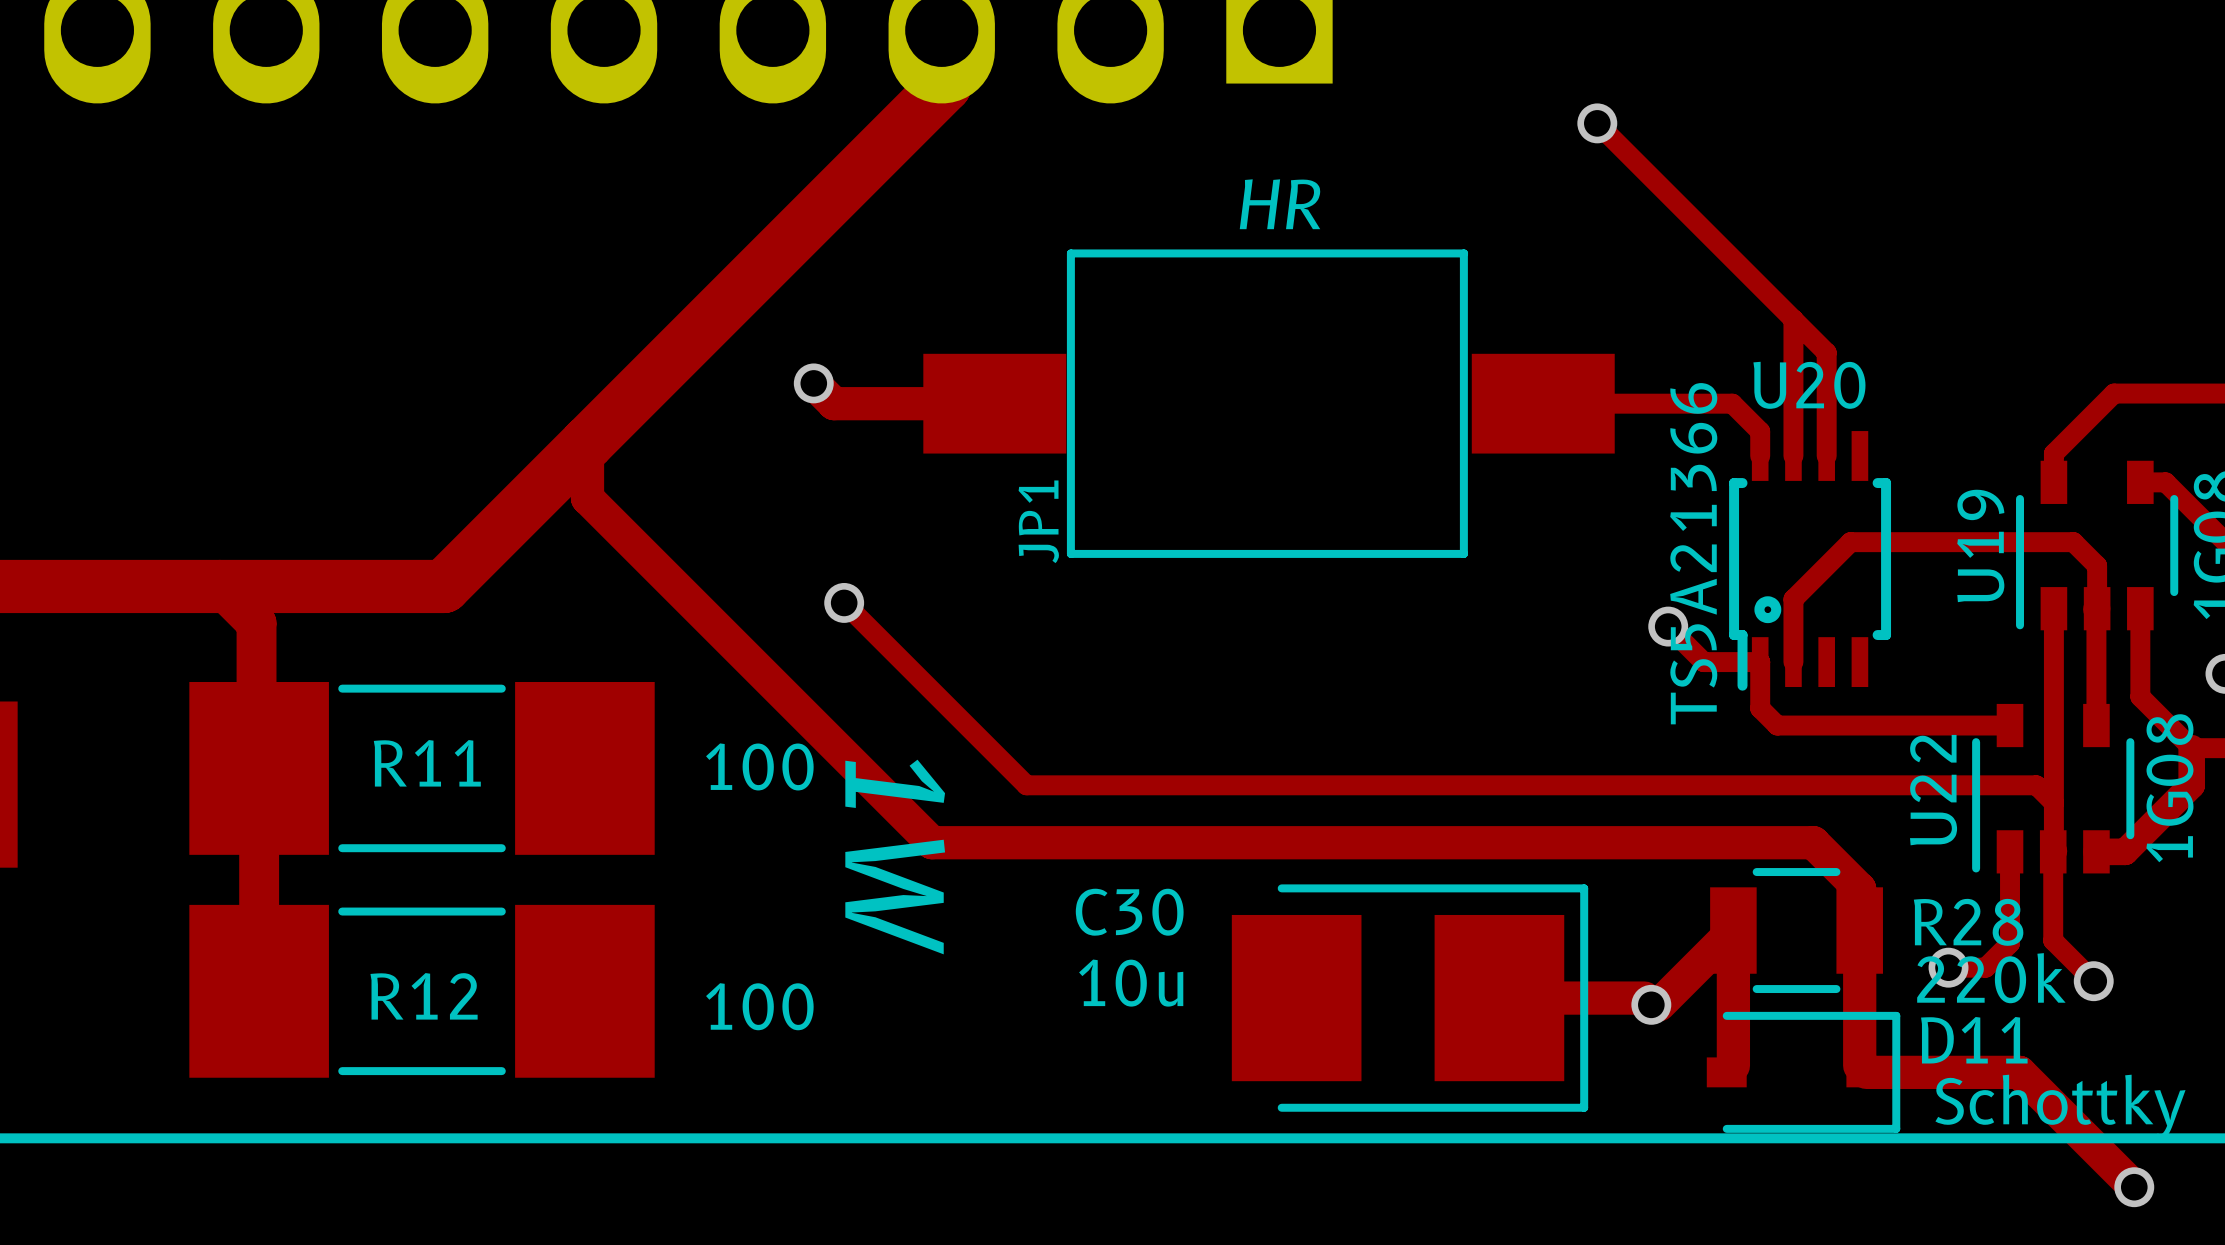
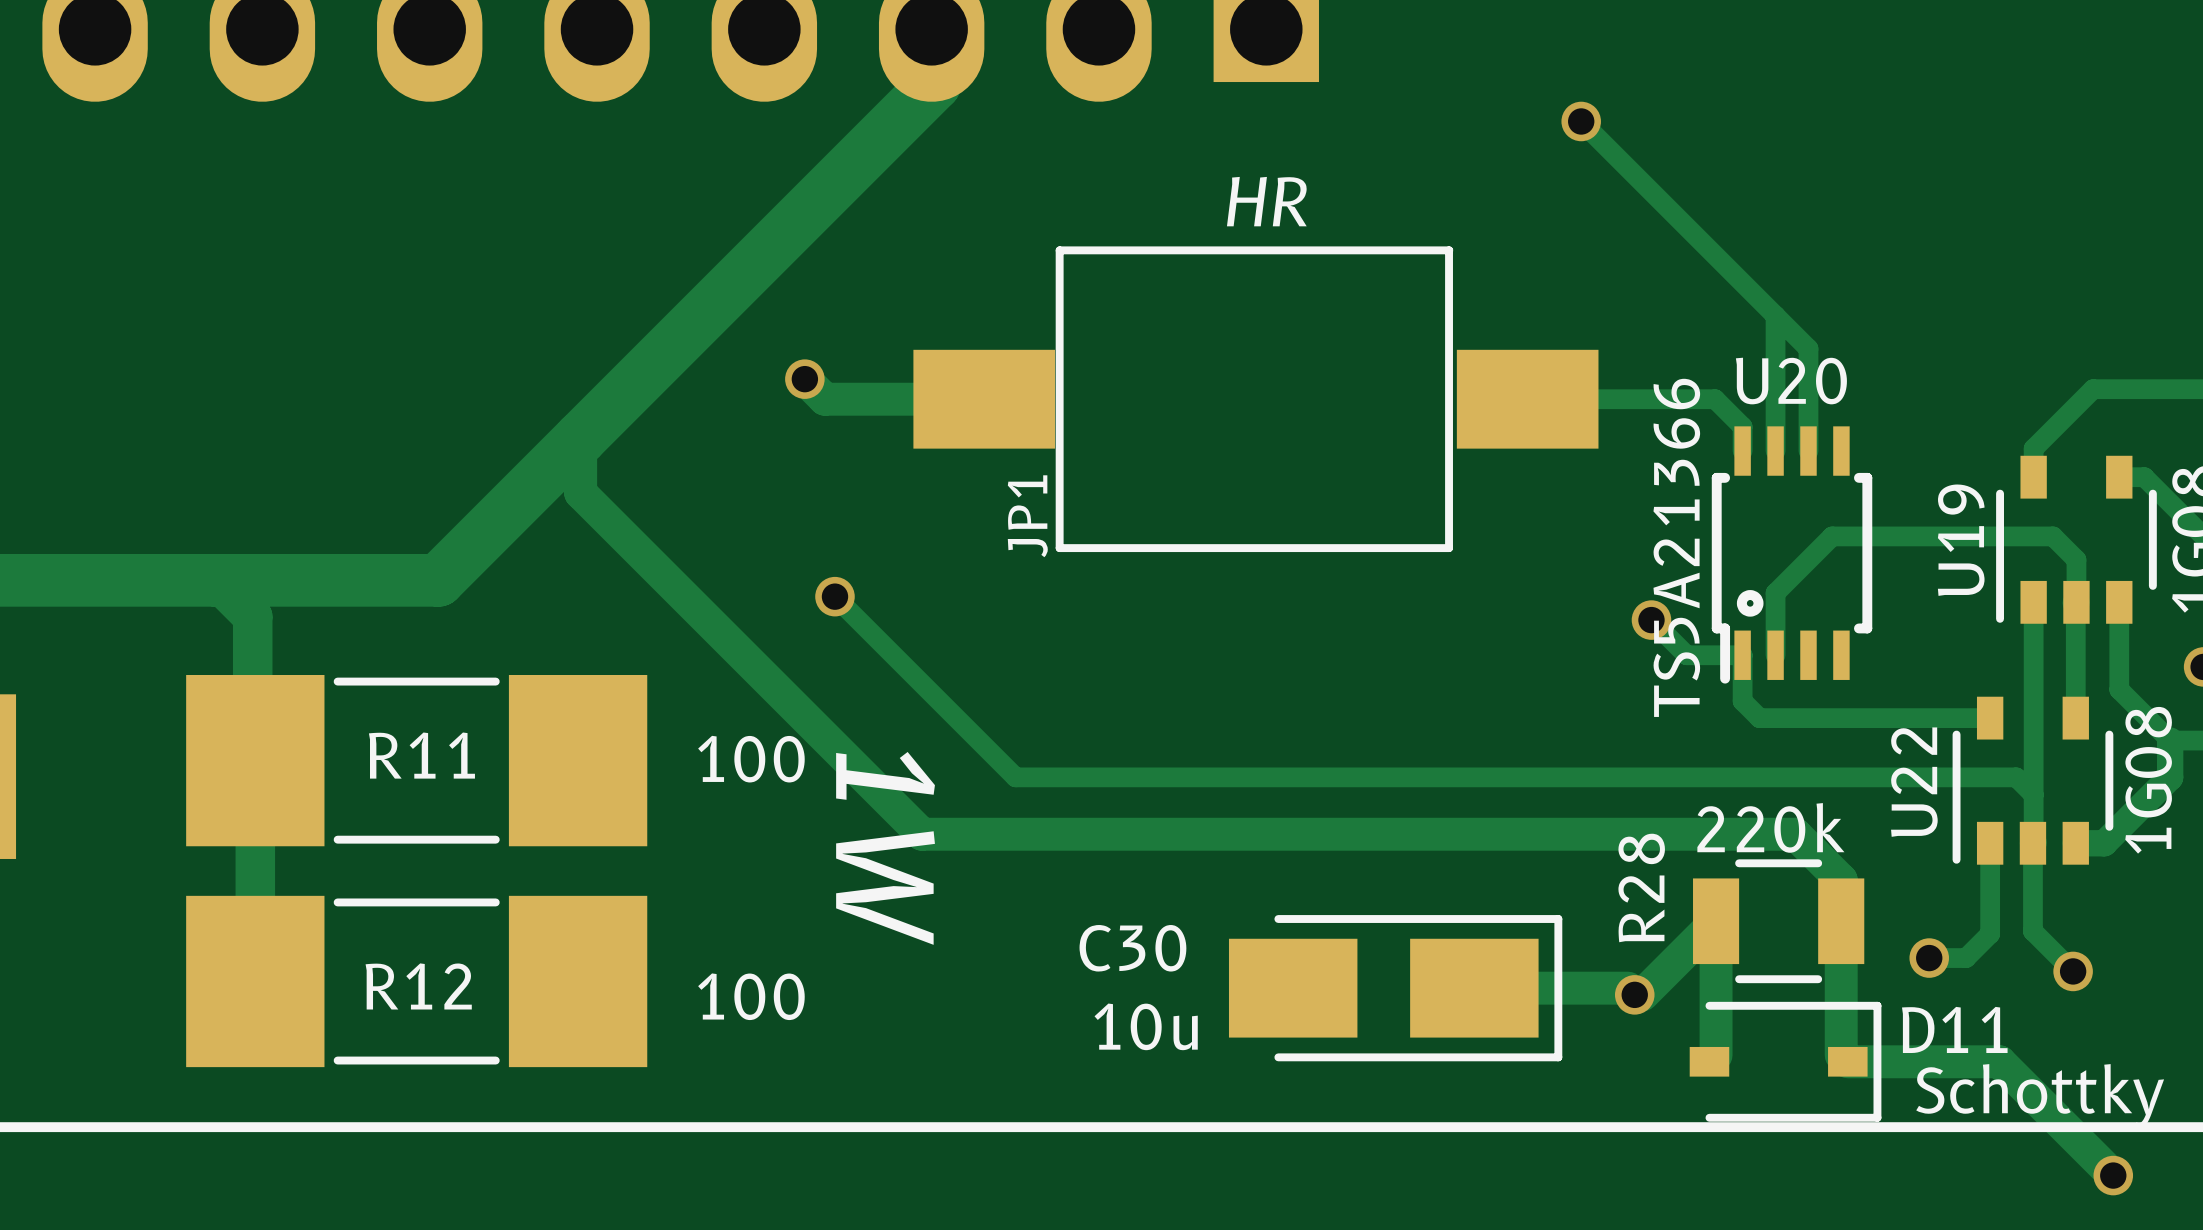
C30 footprint: [1231, 884, 1589, 1112] -> [1228, 915, 1563, 1062]
C30 name position: C30 (1129, 912) -> C30 (1132, 948)
R28 name rotation: 0° (1968, 922) -> 90° counterclockwise (1641, 887)
R28 name position: R28 (1968, 922) -> R28 (1641, 887)
R28 value position: 220k (1991, 978) -> 220k (1770, 827)
C30 value position: 10u (1131, 983) -> 10u (1146, 1026)

